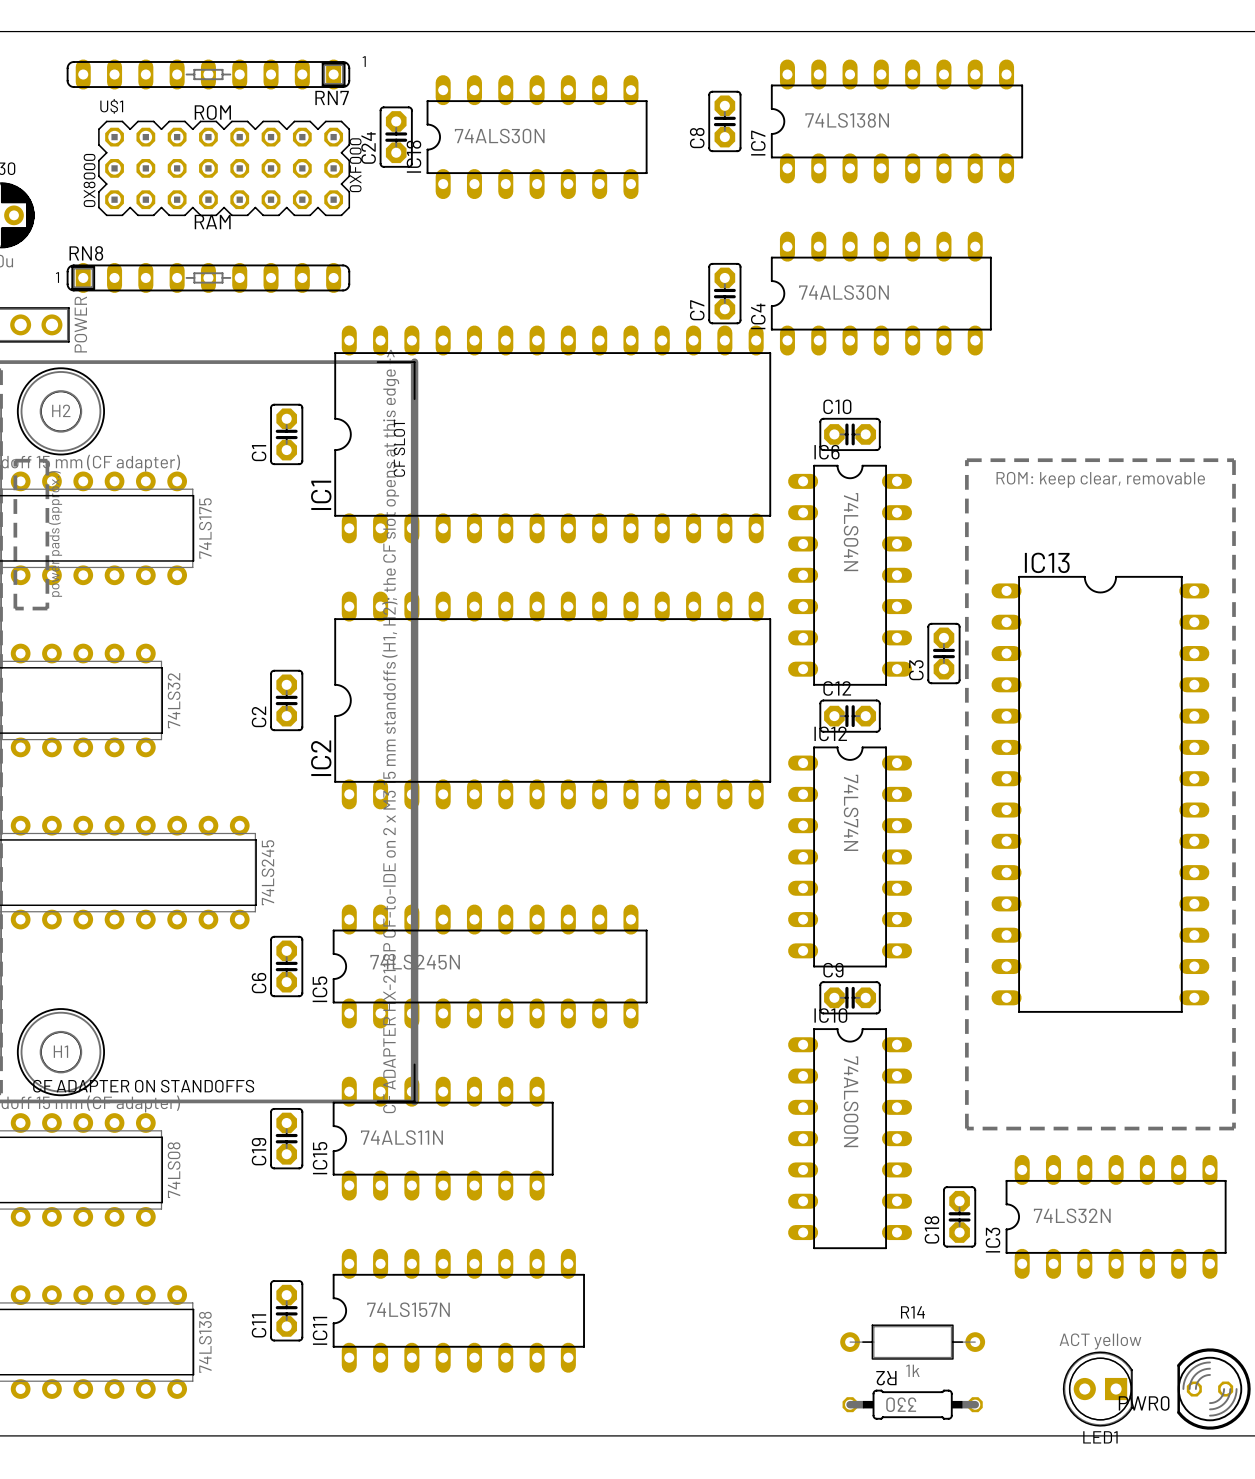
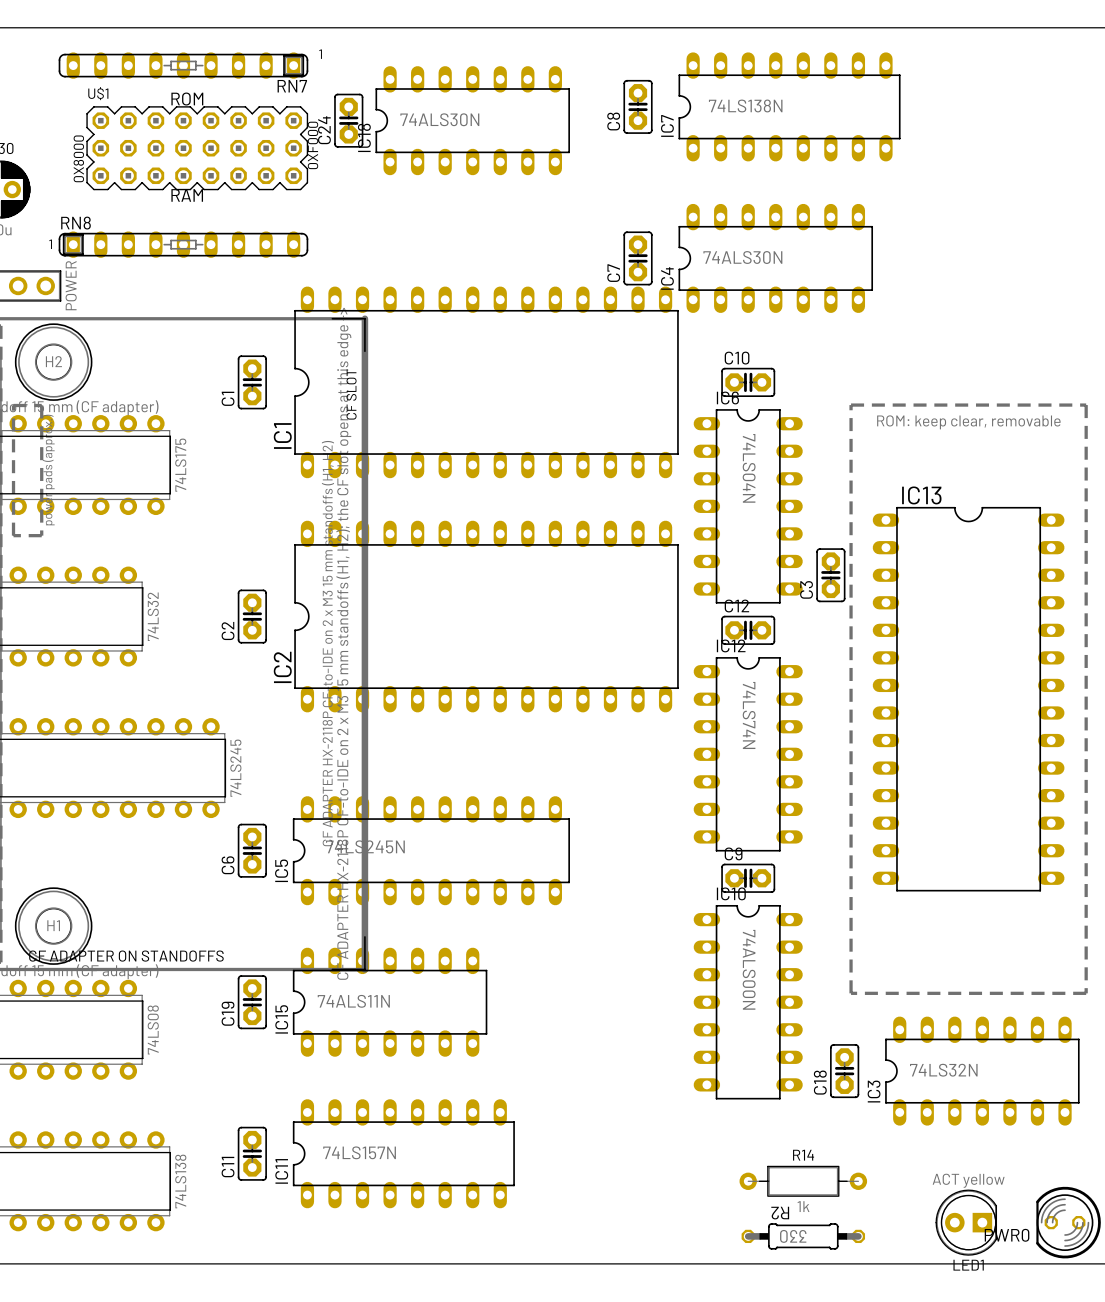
text: none -> CF ADAPTER HX-2118P CF-to-IDE on 2 x M3 15 mm standoffs (H1, H2) (327, 643)

